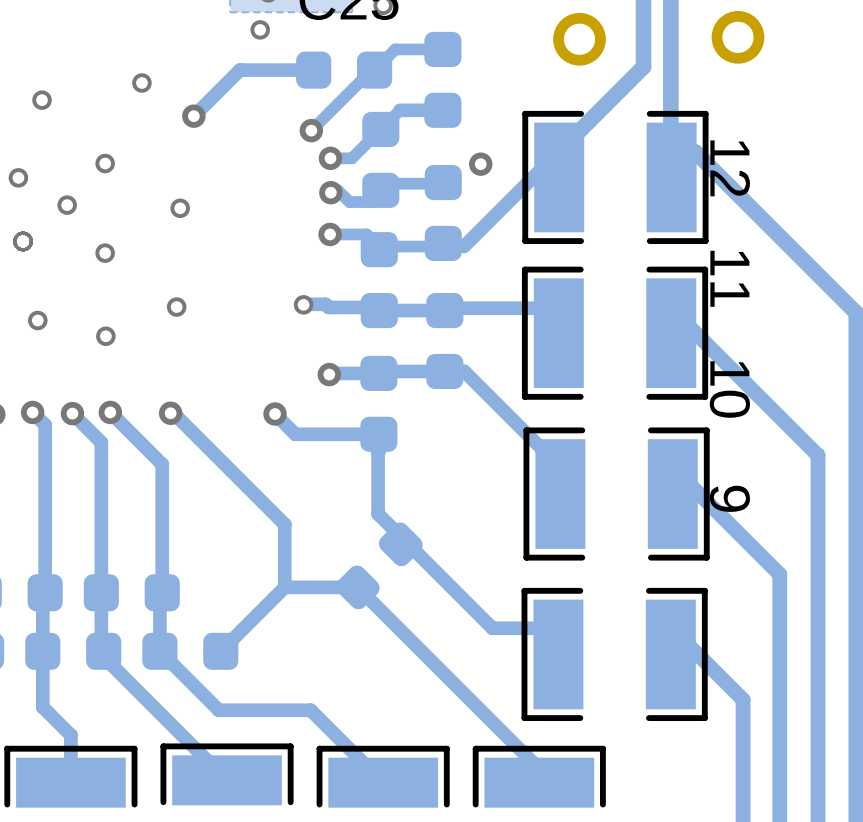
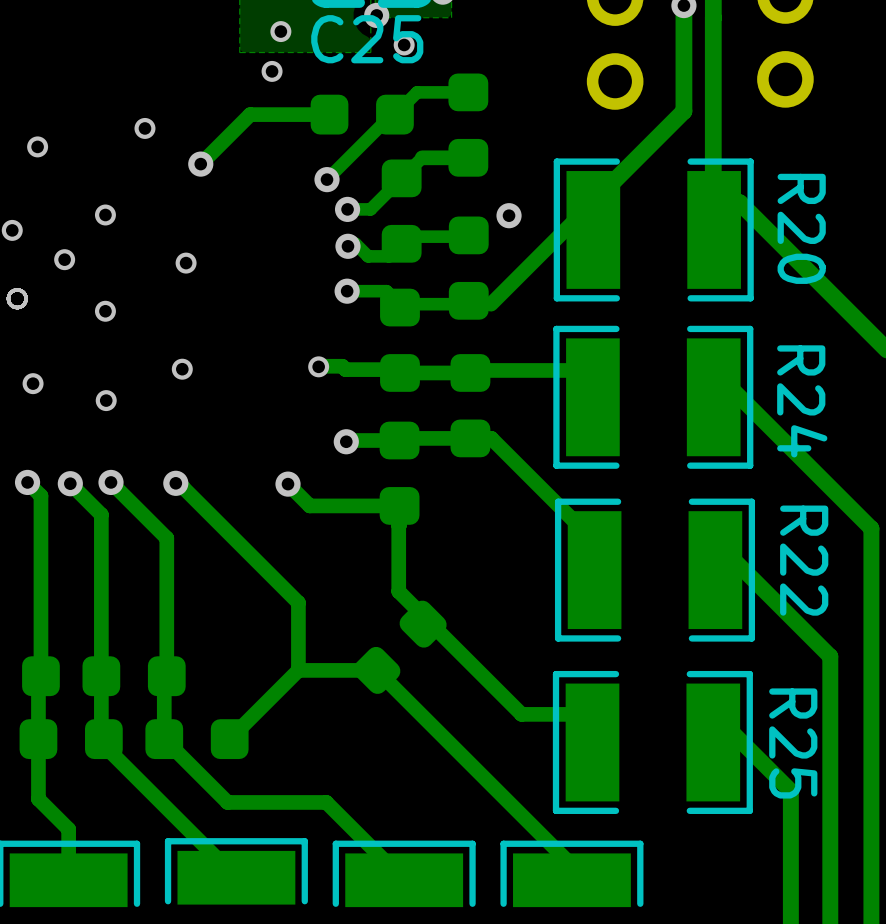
R20 name: none -> R20 (801, 228)
text: 12 11 10 9 (729, 326) -> none
R24 name: none -> R24 (802, 401)
R22 name: none -> R22 (804, 560)
R25 name: none -> R25 (793, 743)

